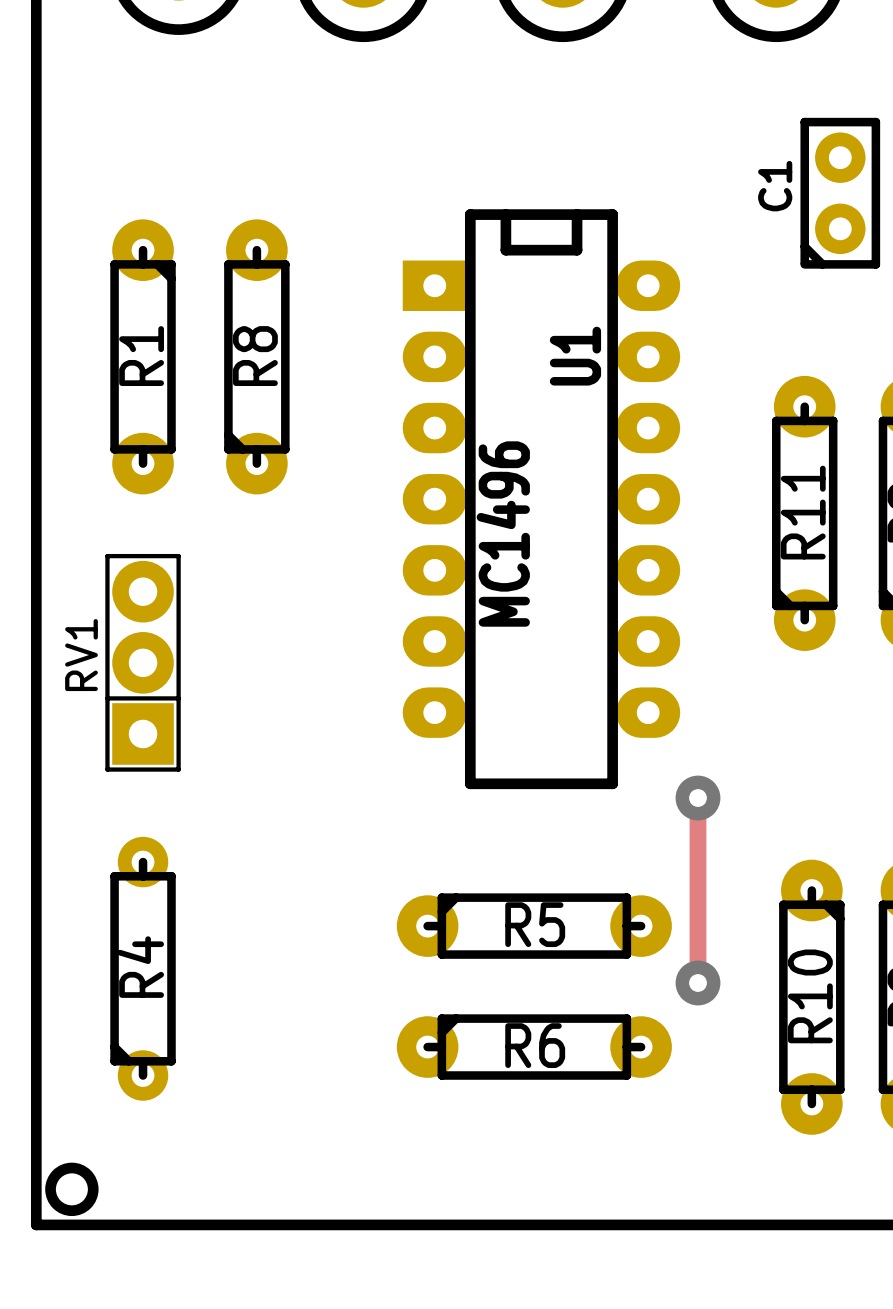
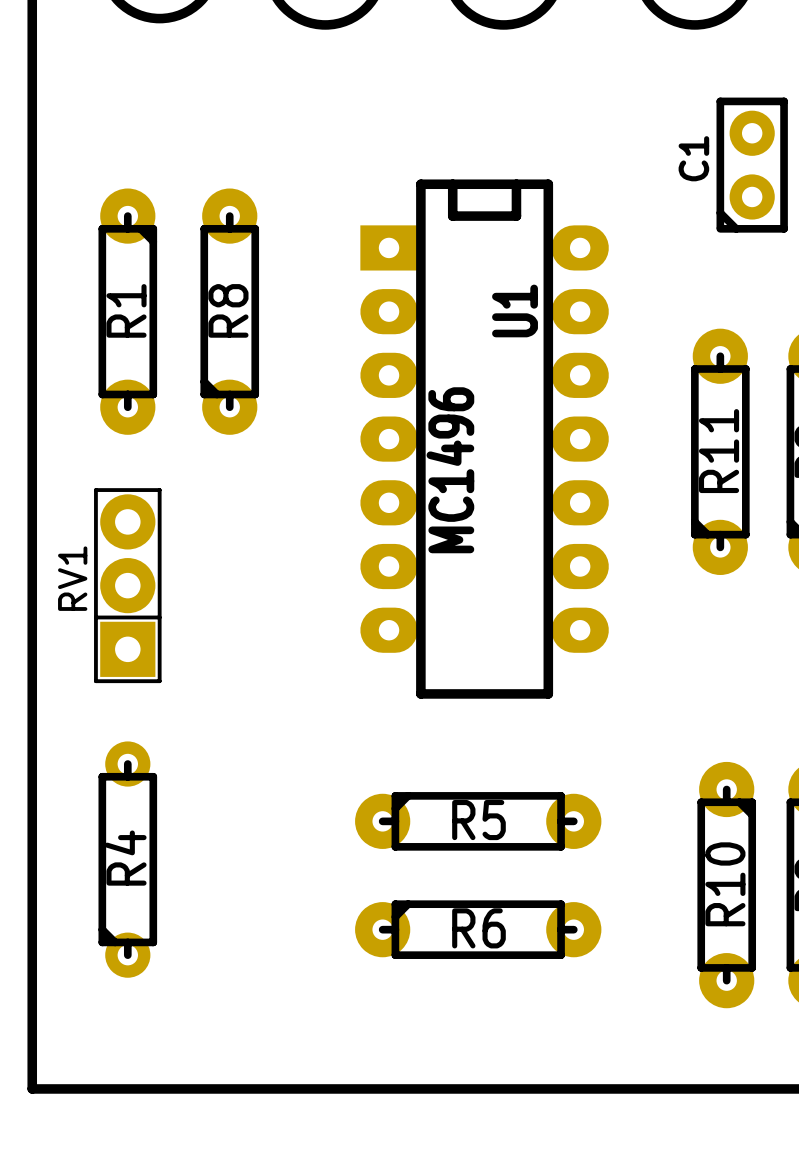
track: (698, 798) (698, 983) -> none
via: (698, 798) -> none
via: (698, 983) -> none
round board edge: [45, 1162, 99, 1217] -> none

